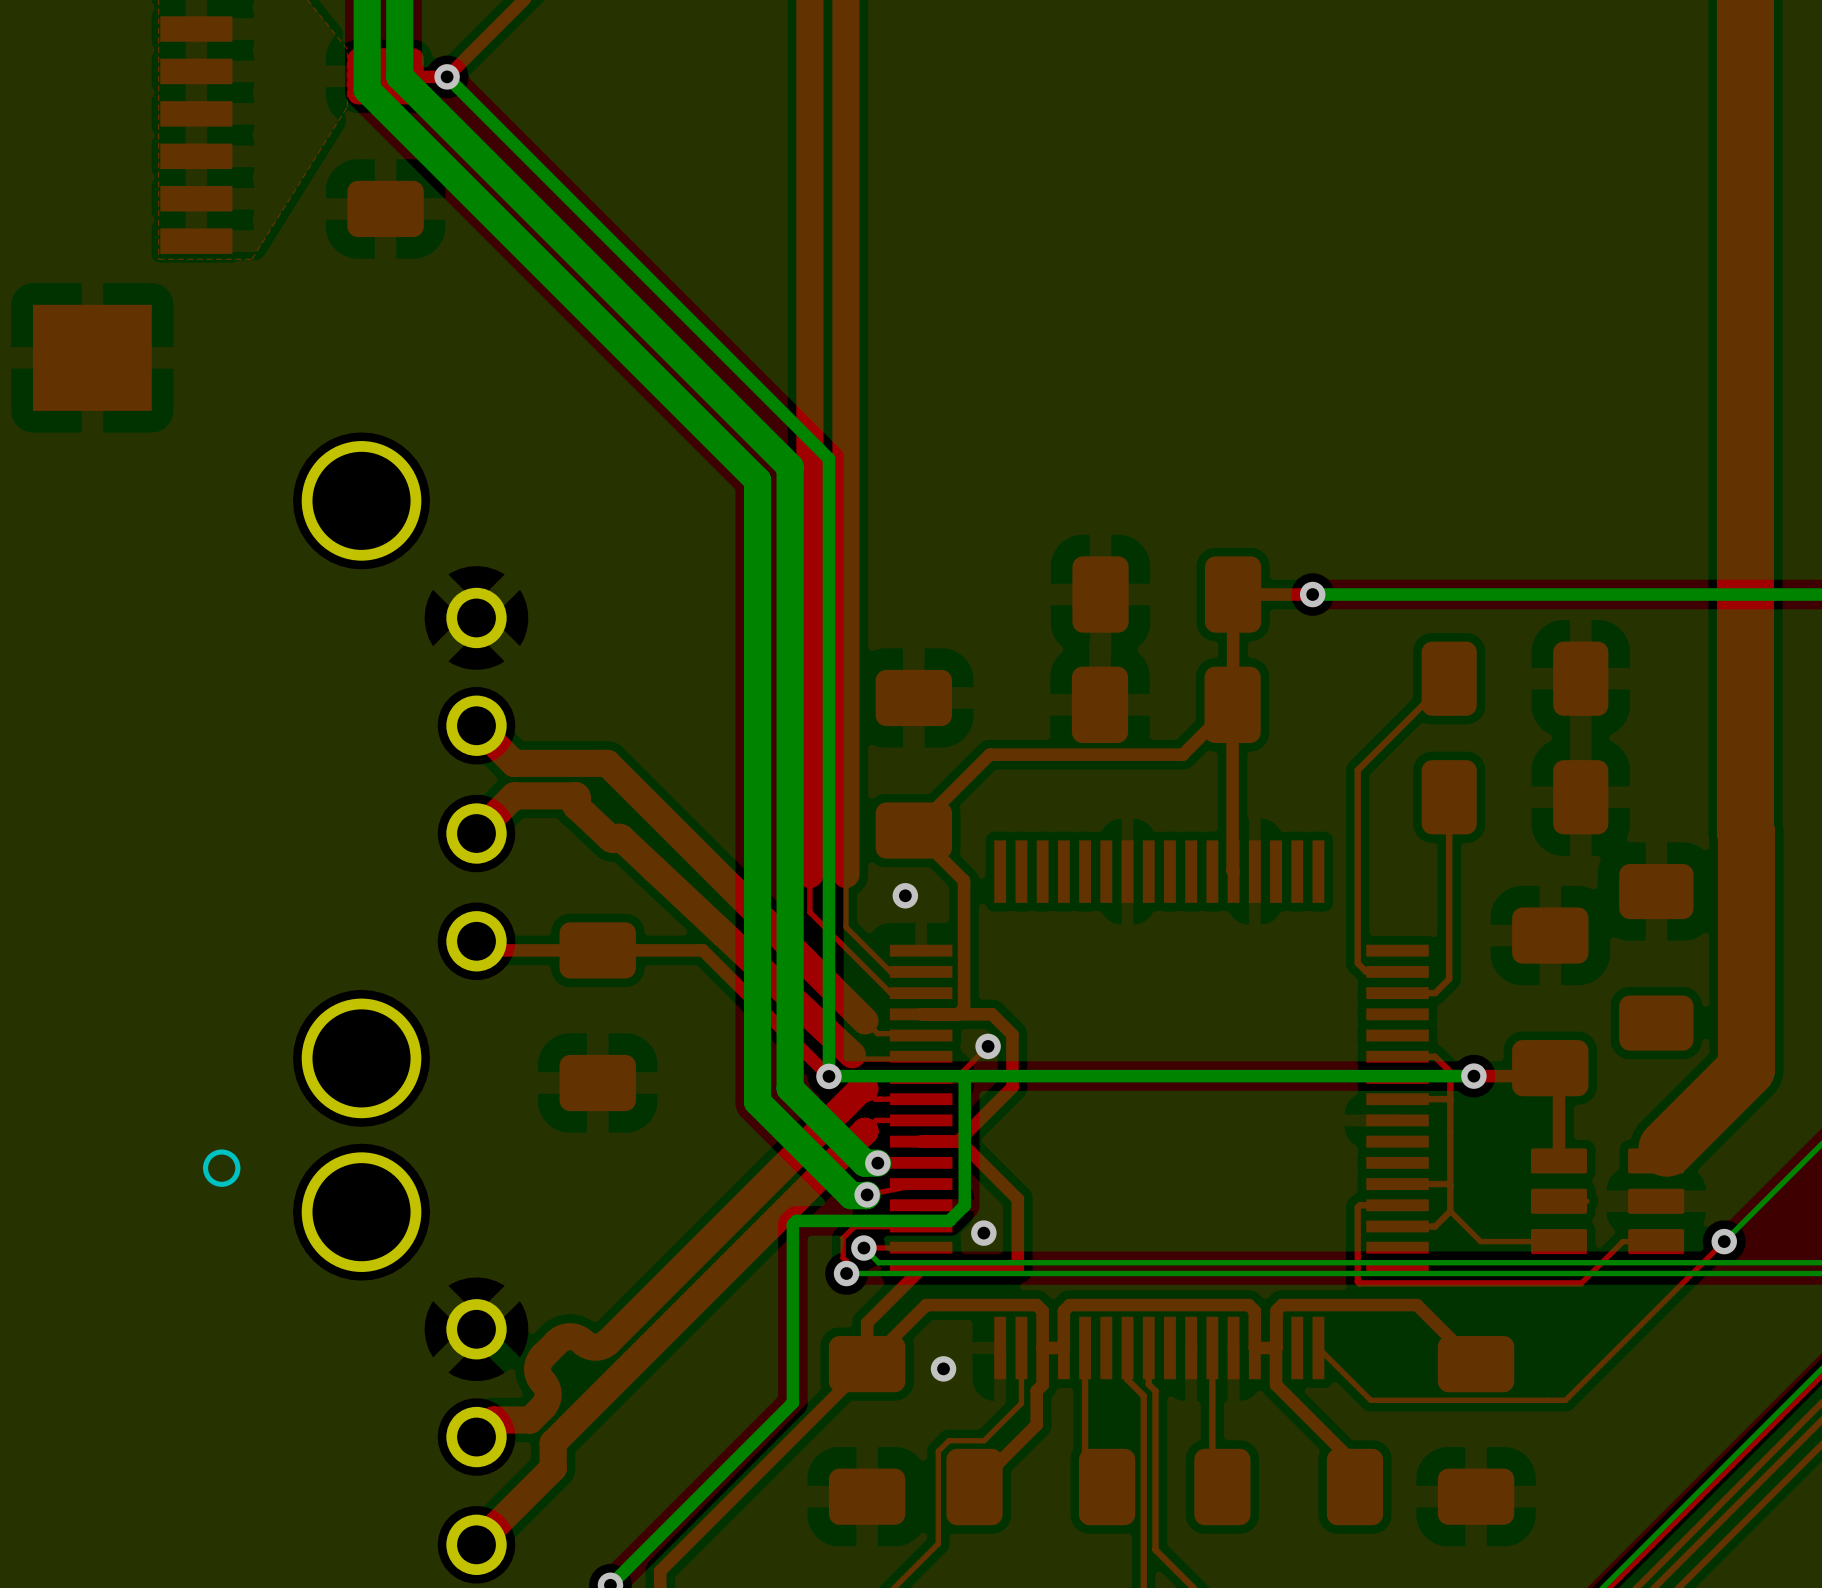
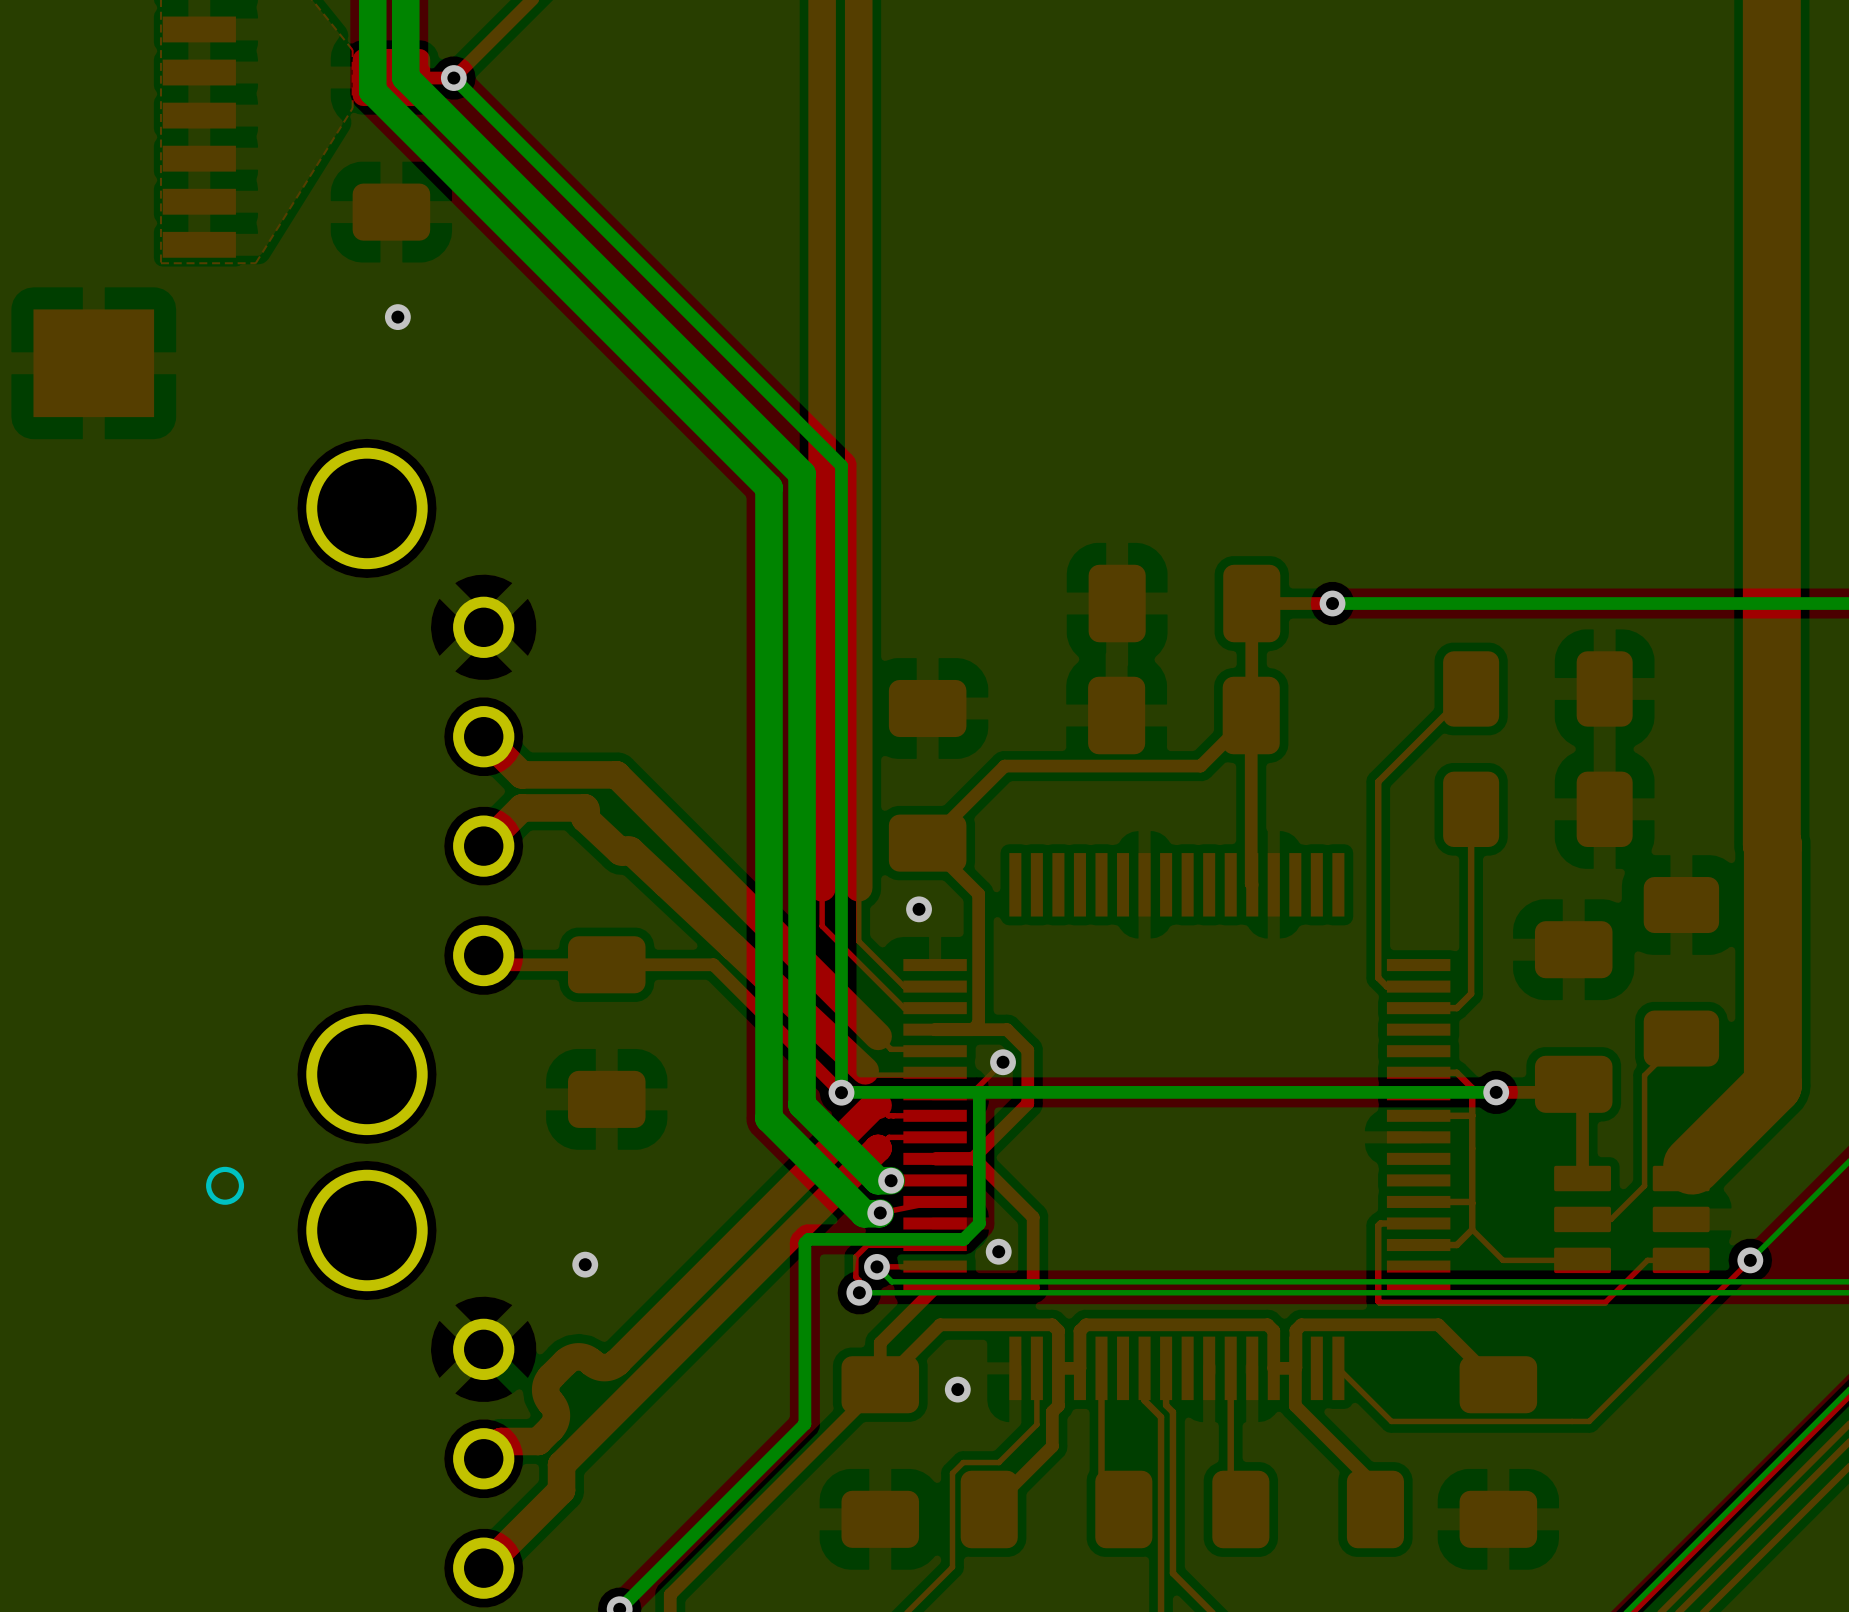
via: none -> (397, 317)
top track: none -> (1681, 1038) (1644, 1075) (1644, 1185) (1610, 1219)
via: none -> (585, 1264)

